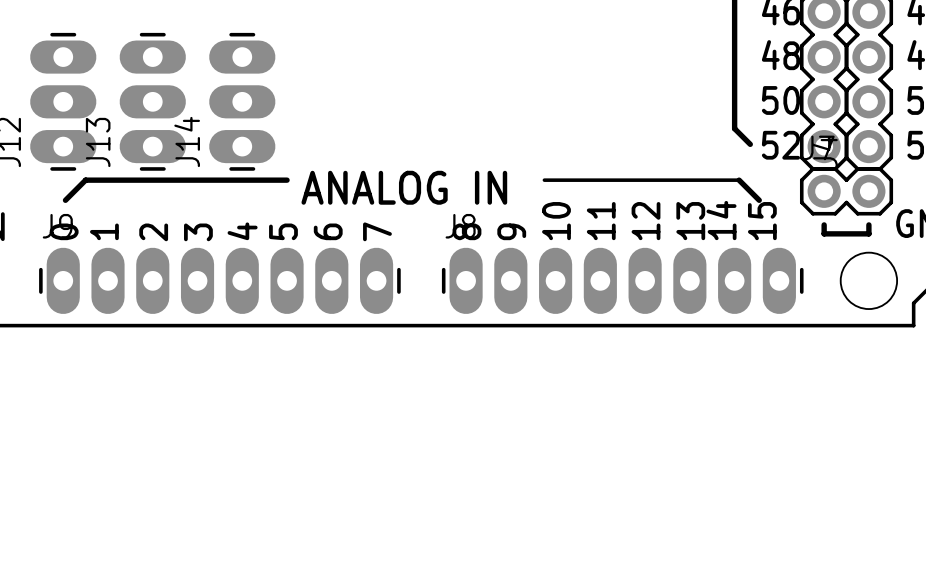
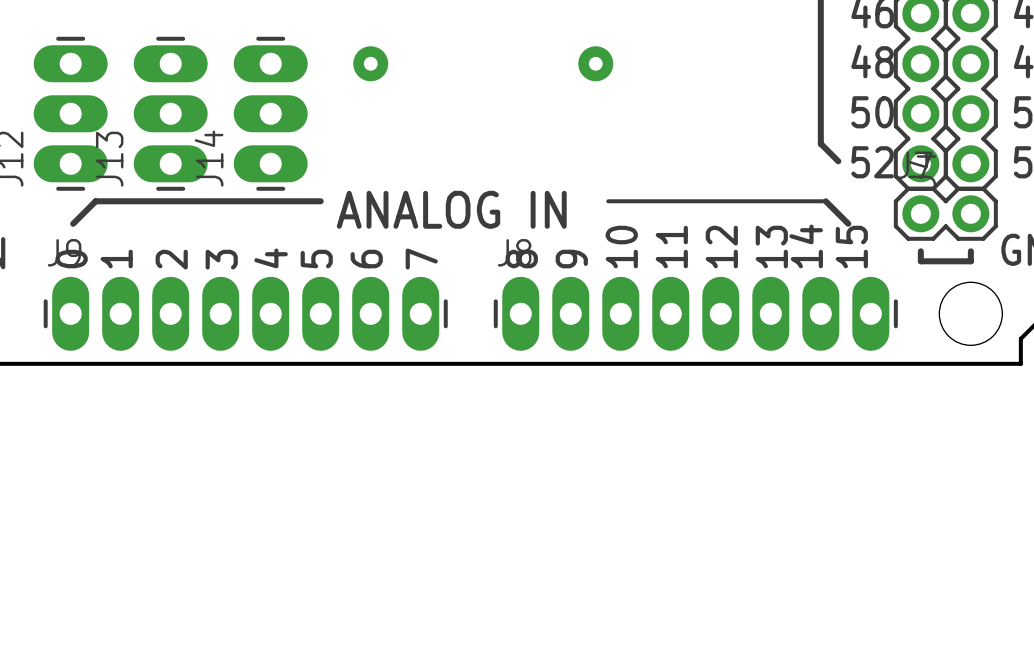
via: none -> (370, 63)
via: none -> (595, 63)

